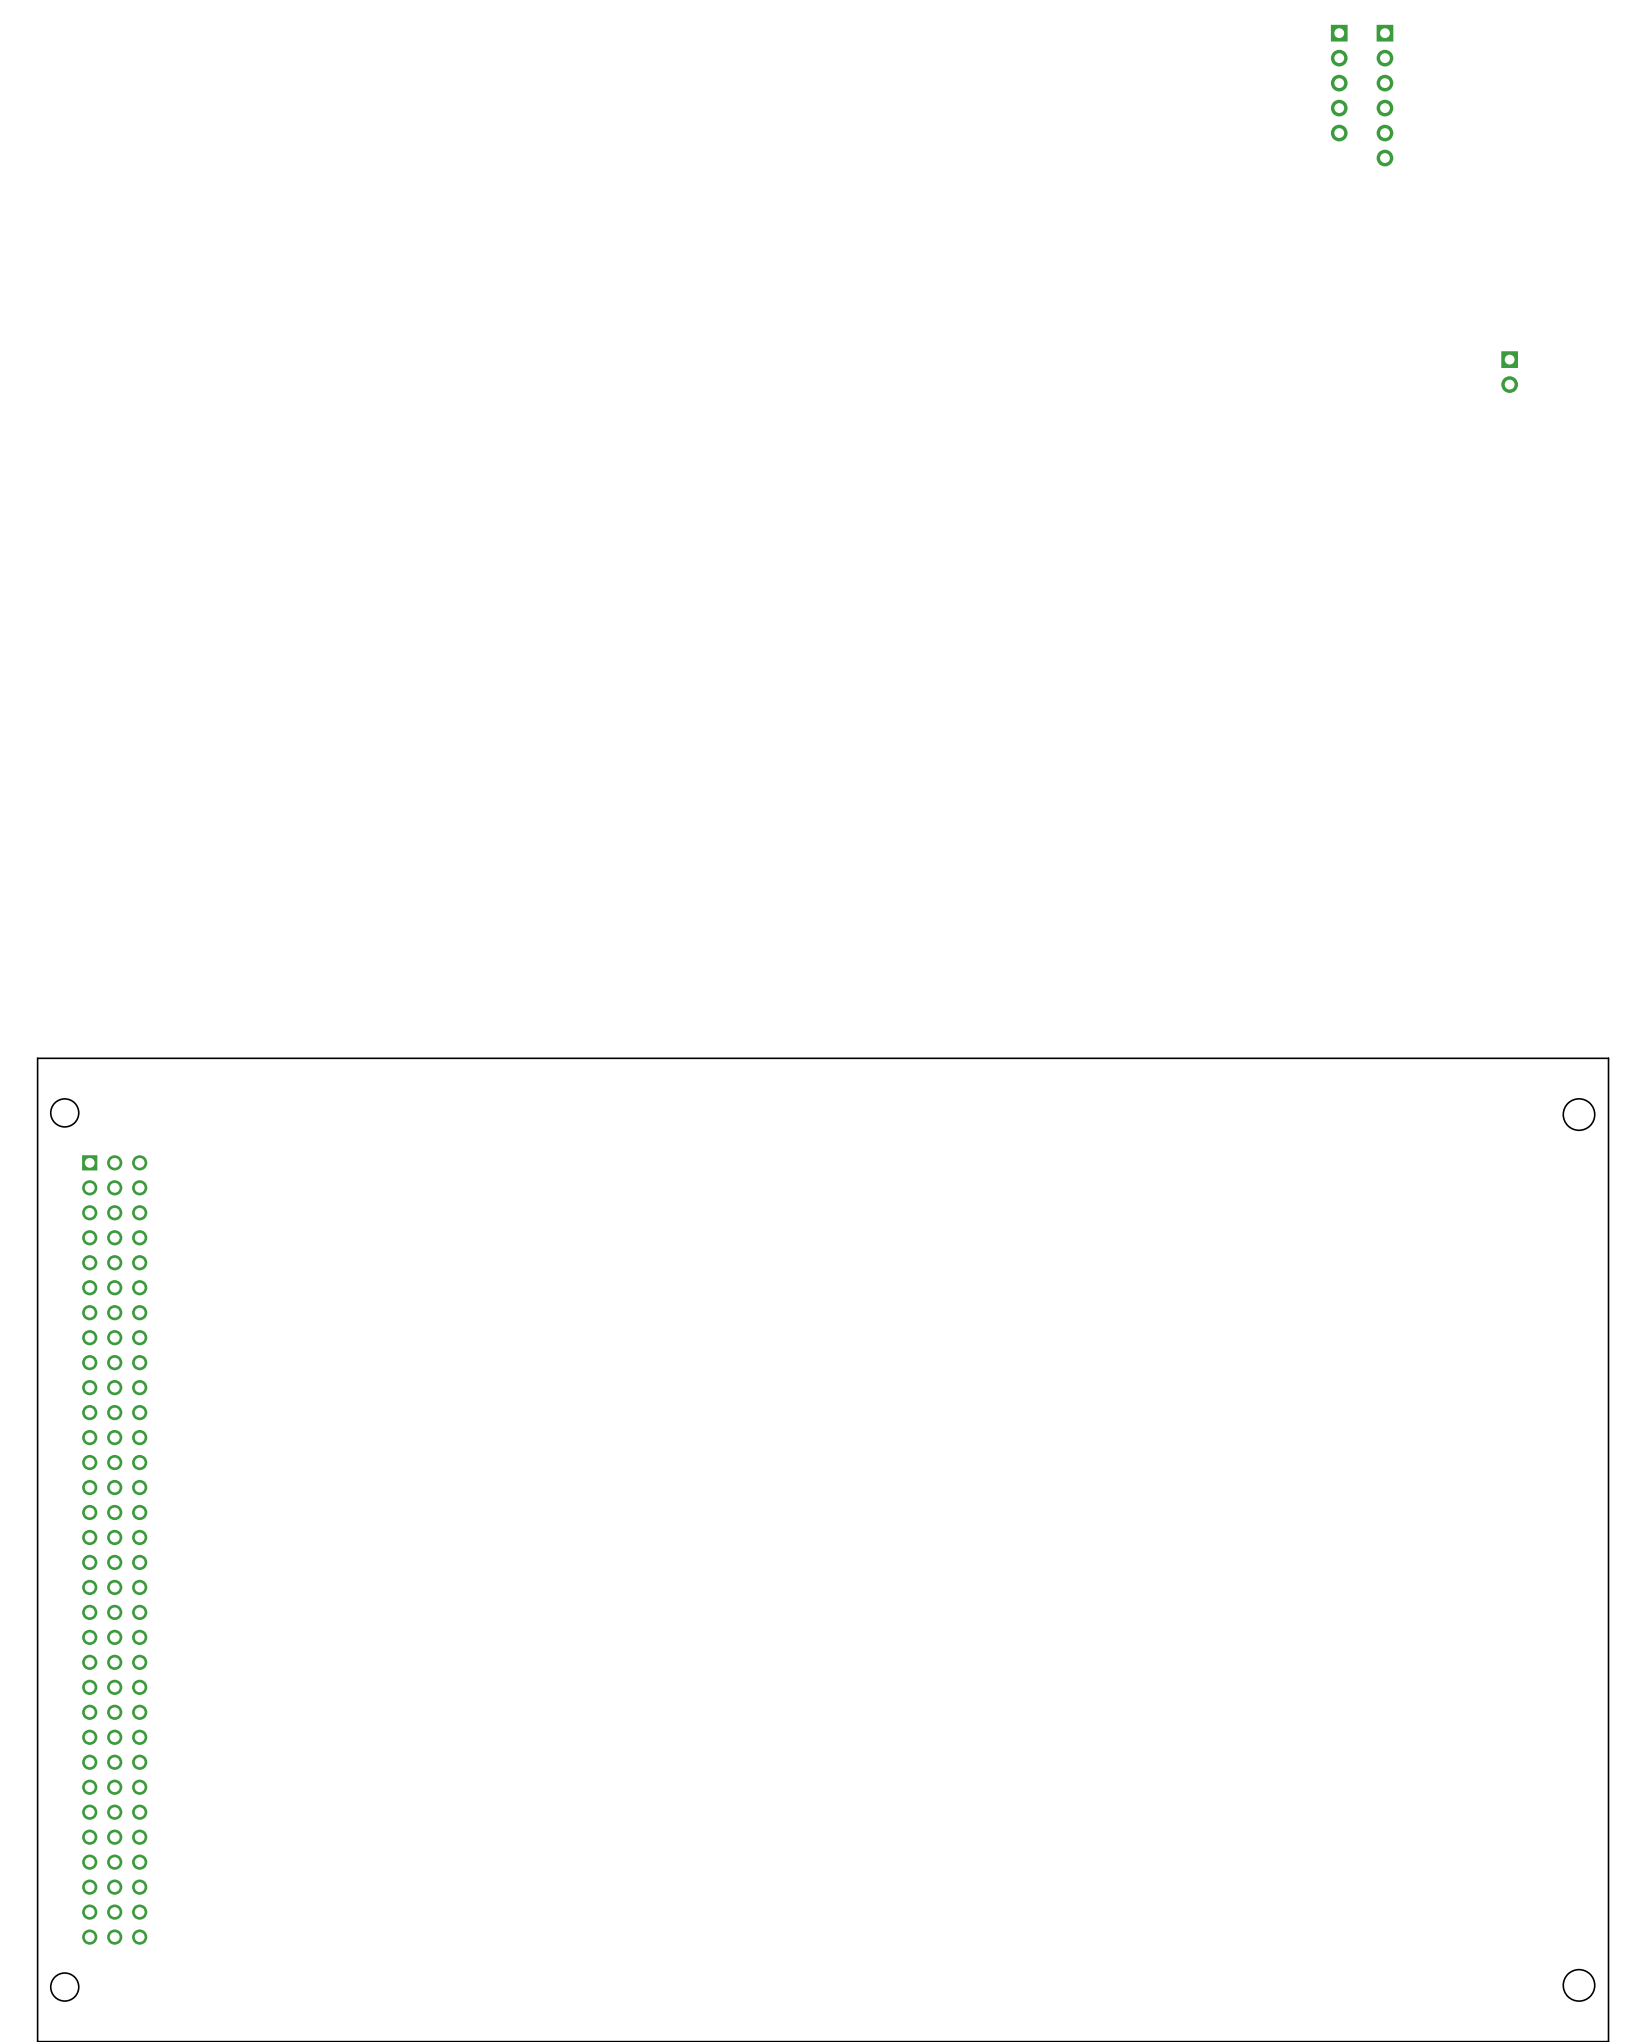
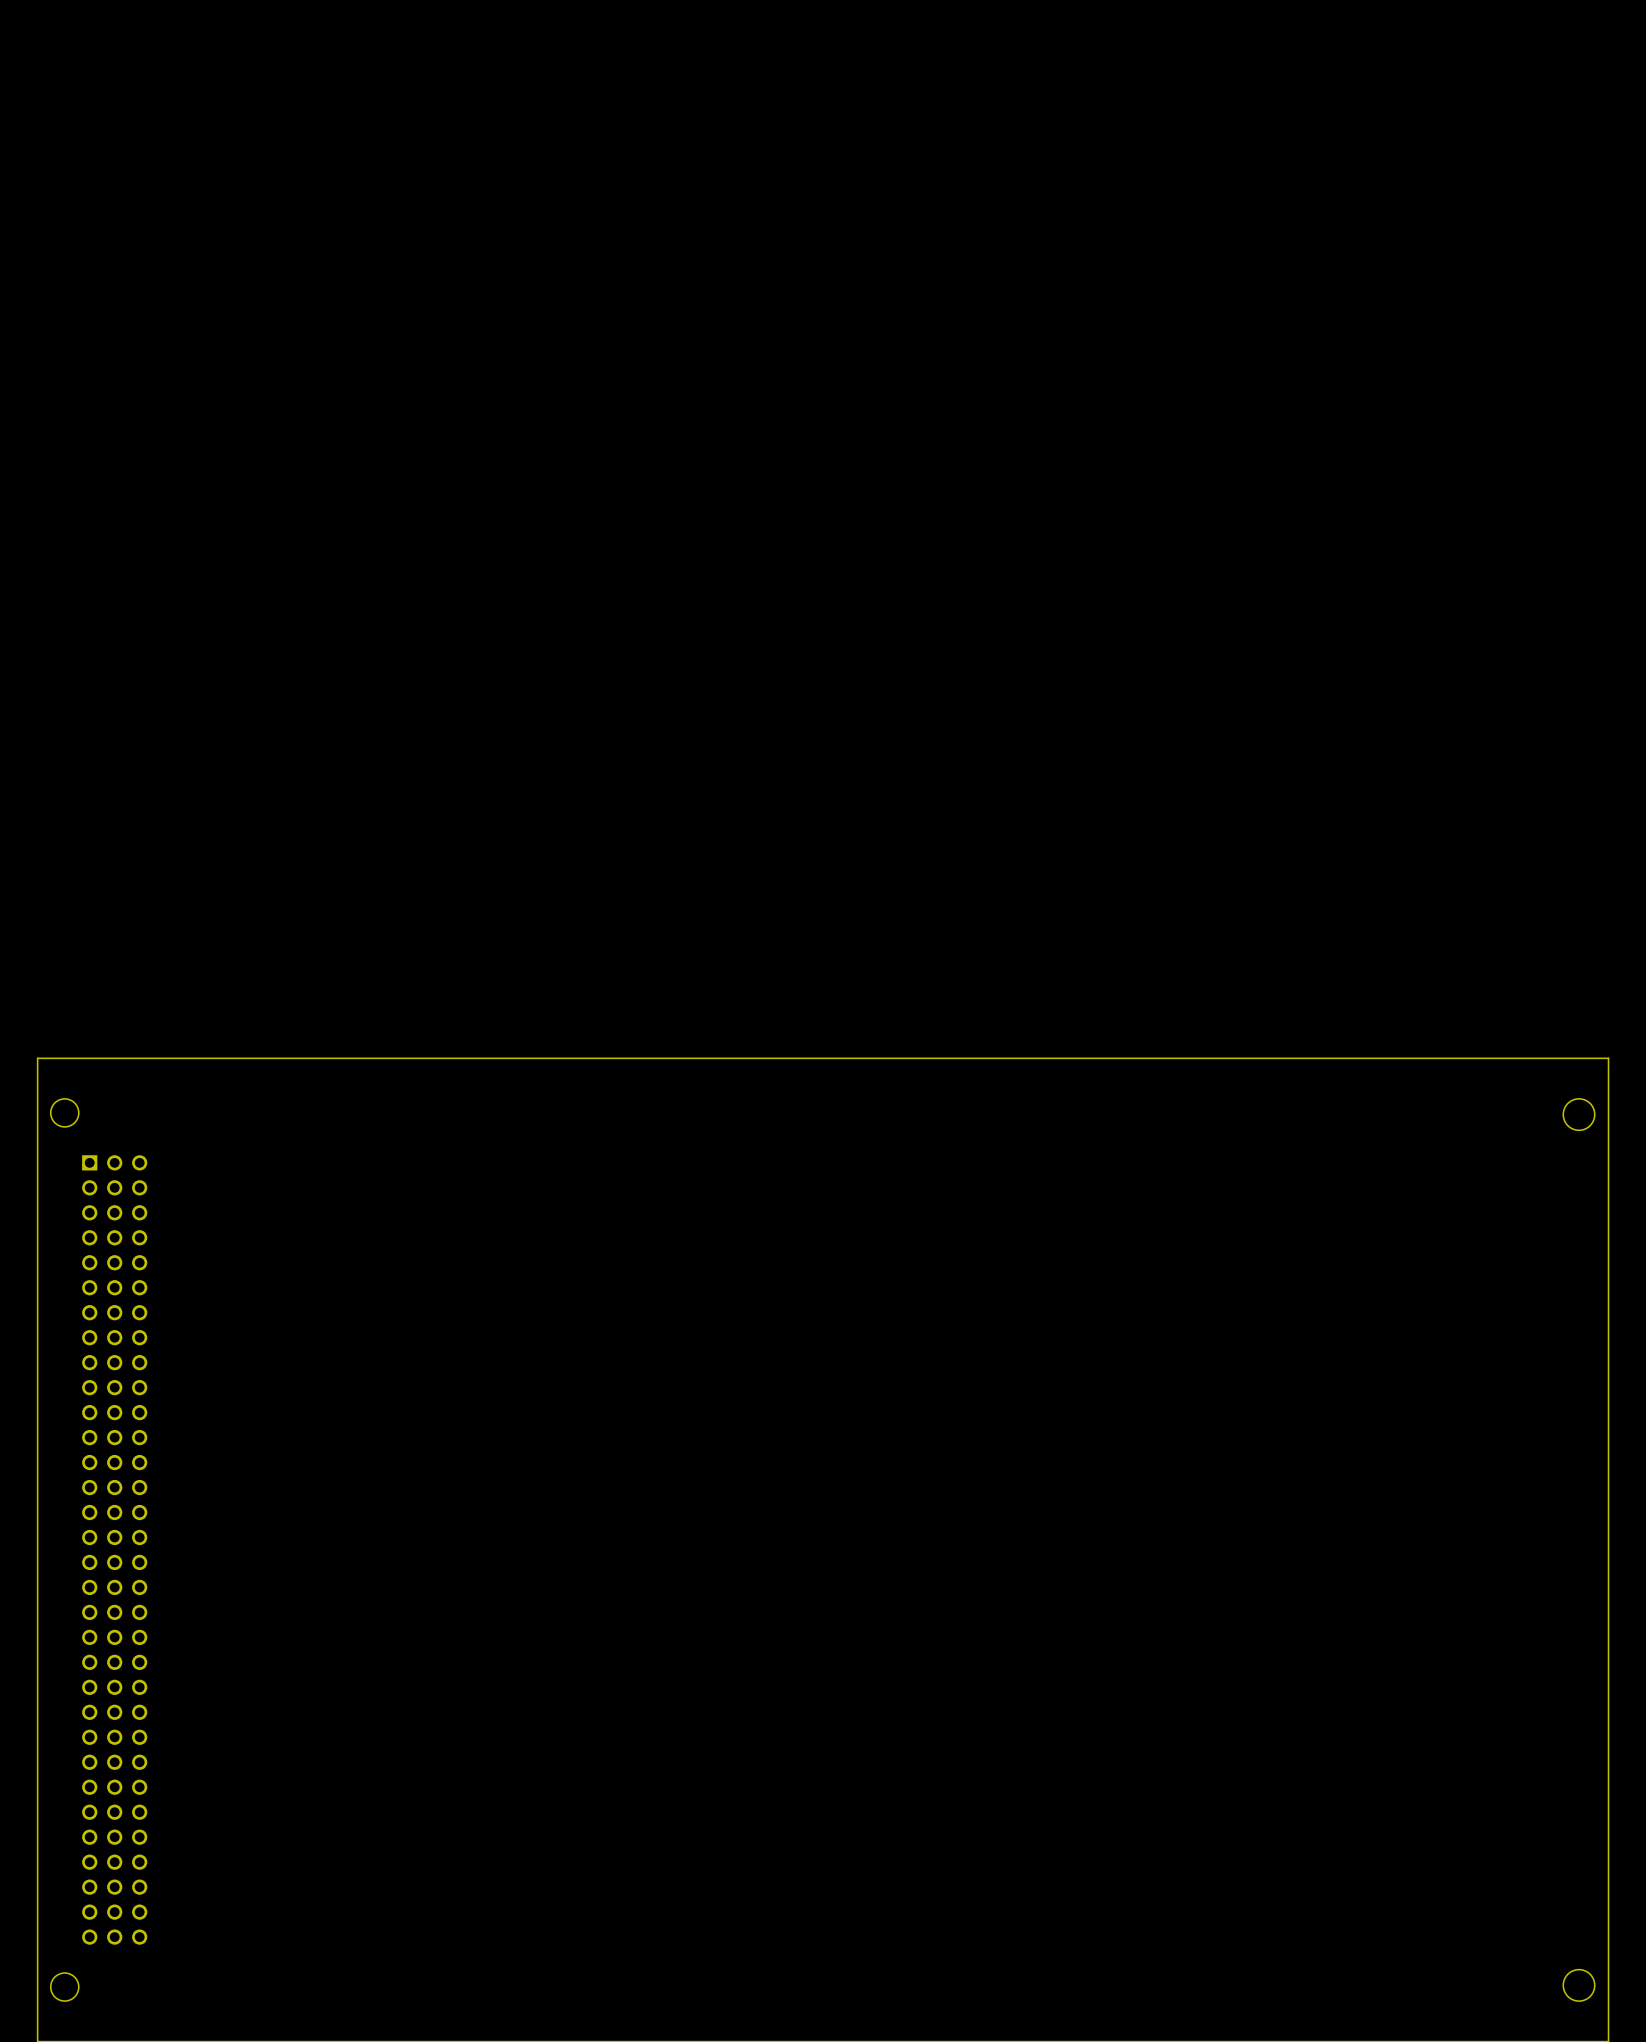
part: (1339, 83) -> none
part: (1384, 95) -> none
part: (1509, 372) -> none

